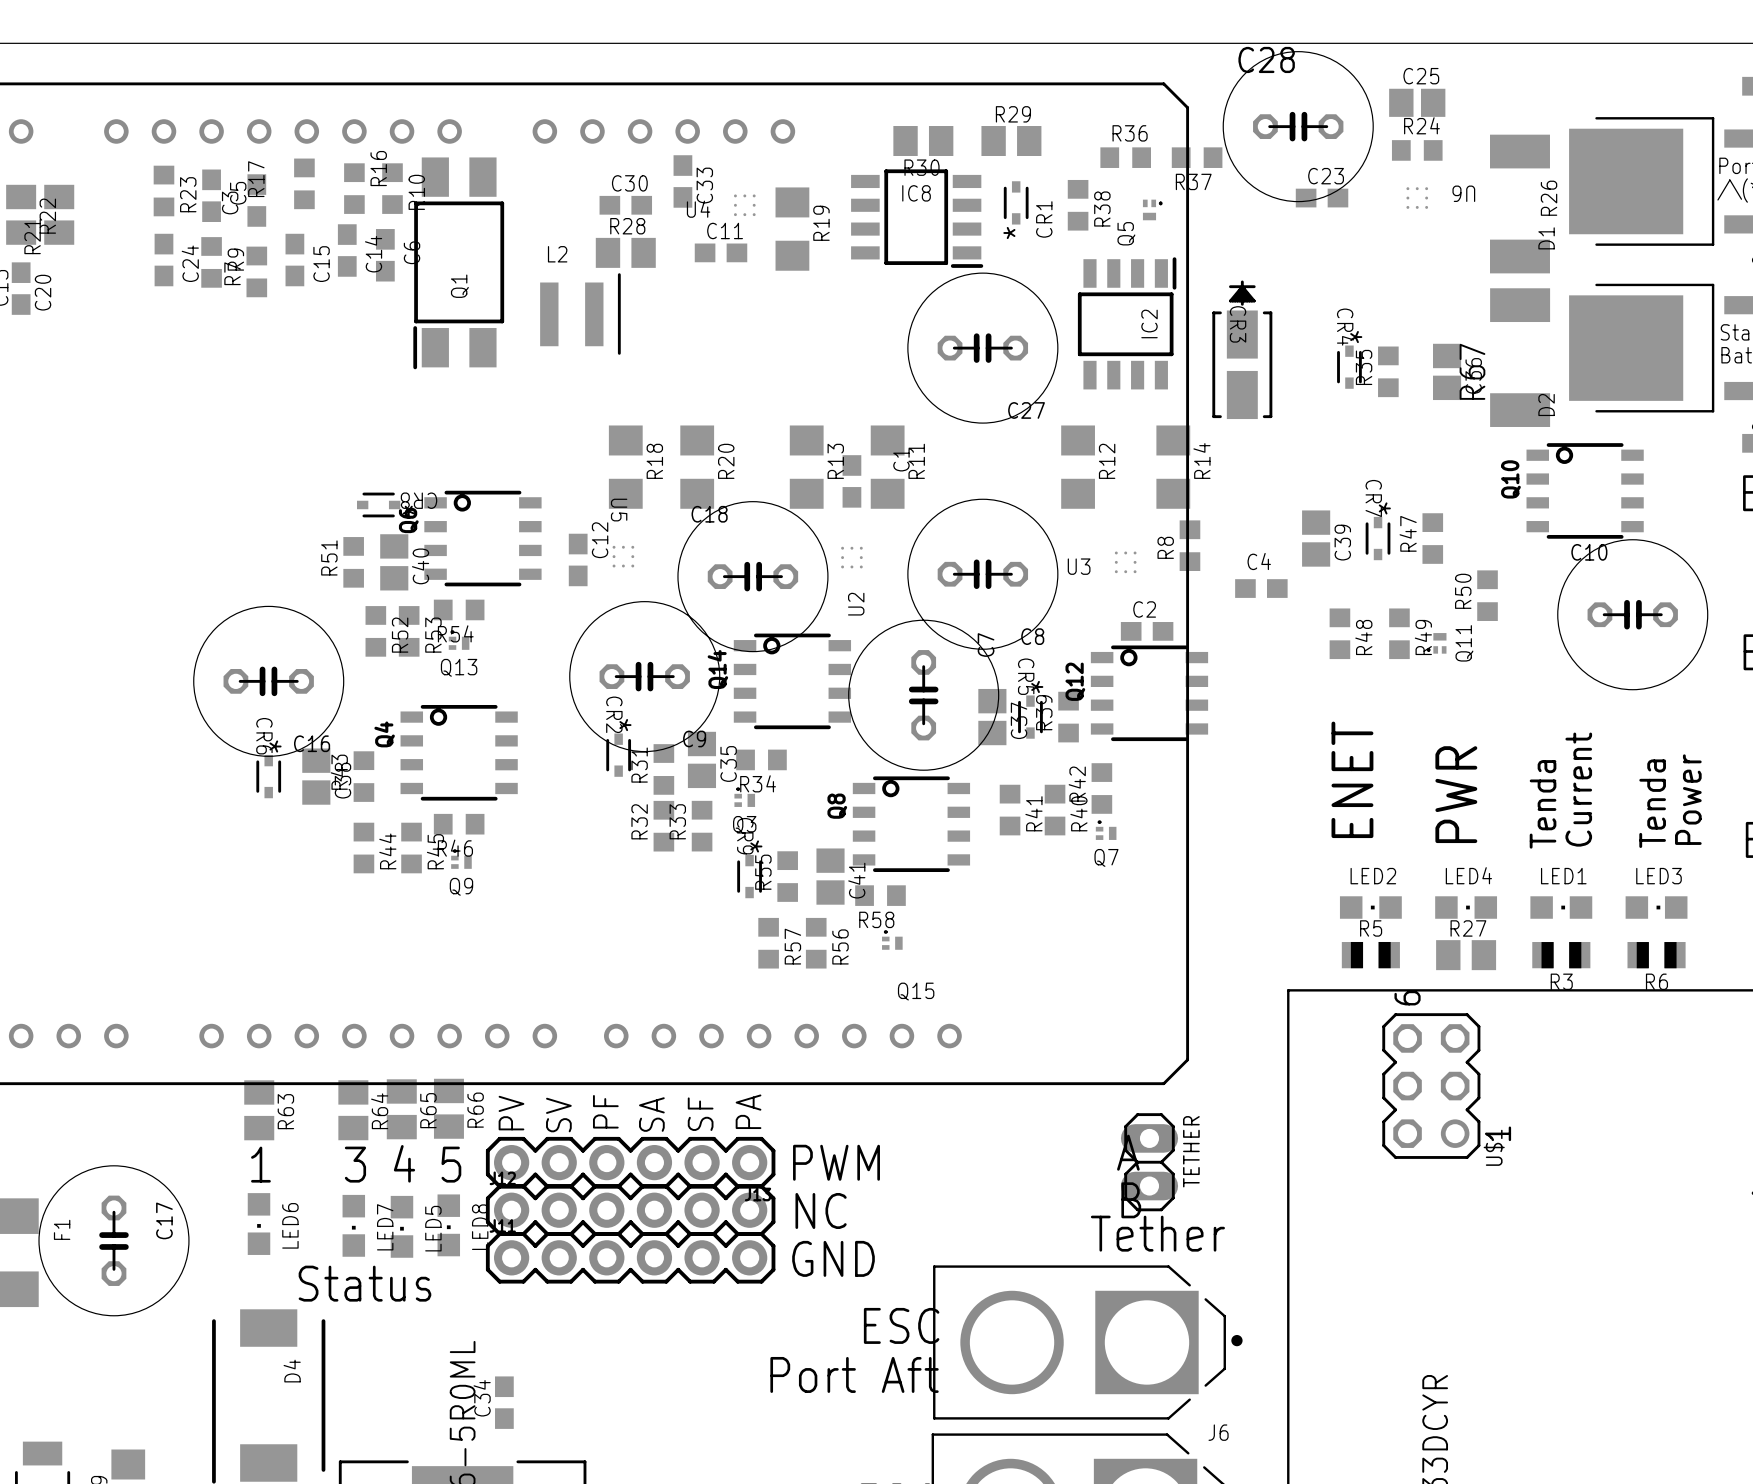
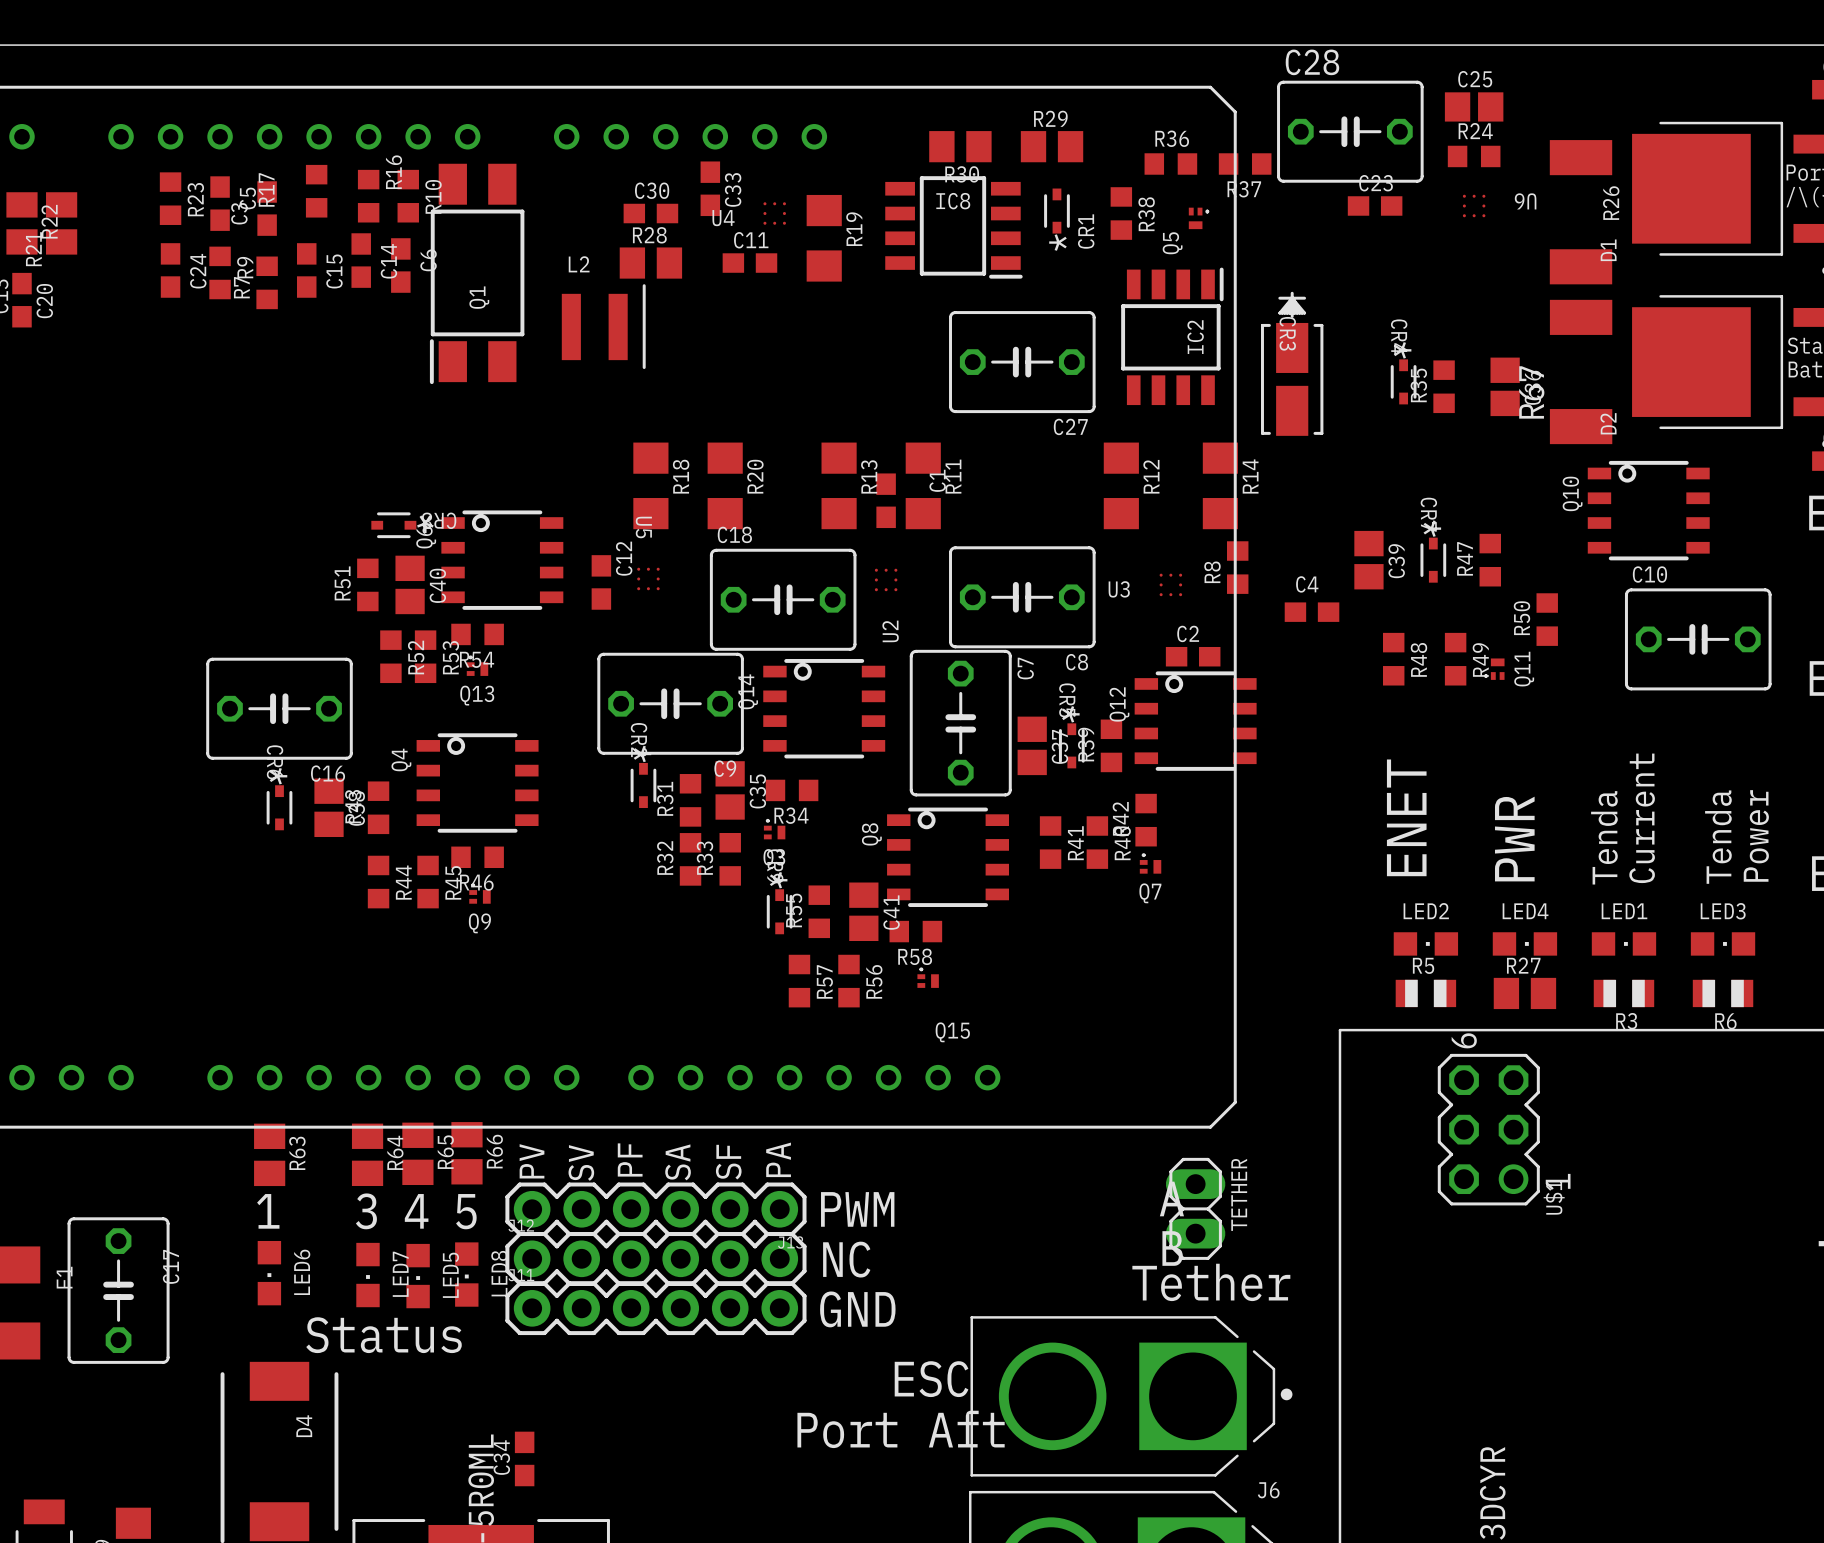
C28 footprint: [1222, 51, 1374, 203] -> [1277, 80, 1424, 183]
C27 footprint: [907, 272, 1059, 424] -> [949, 311, 1096, 414]
C8 footprint: [907, 498, 1059, 650] -> [949, 546, 1096, 649]
C18 footprint: [677, 501, 829, 653] -> [709, 548, 857, 651]
C10 footprint: [1557, 539, 1709, 691] -> [1624, 588, 1772, 691]
C9 footprint: [569, 601, 721, 753] -> [597, 652, 744, 755]
C16 footprint: [193, 605, 345, 757] -> [206, 657, 353, 760]
C7 footprint: [848, 619, 1000, 771] -> [909, 649, 1012, 797]
C17 footprint: [38, 1165, 190, 1317] -> [67, 1217, 170, 1364]

